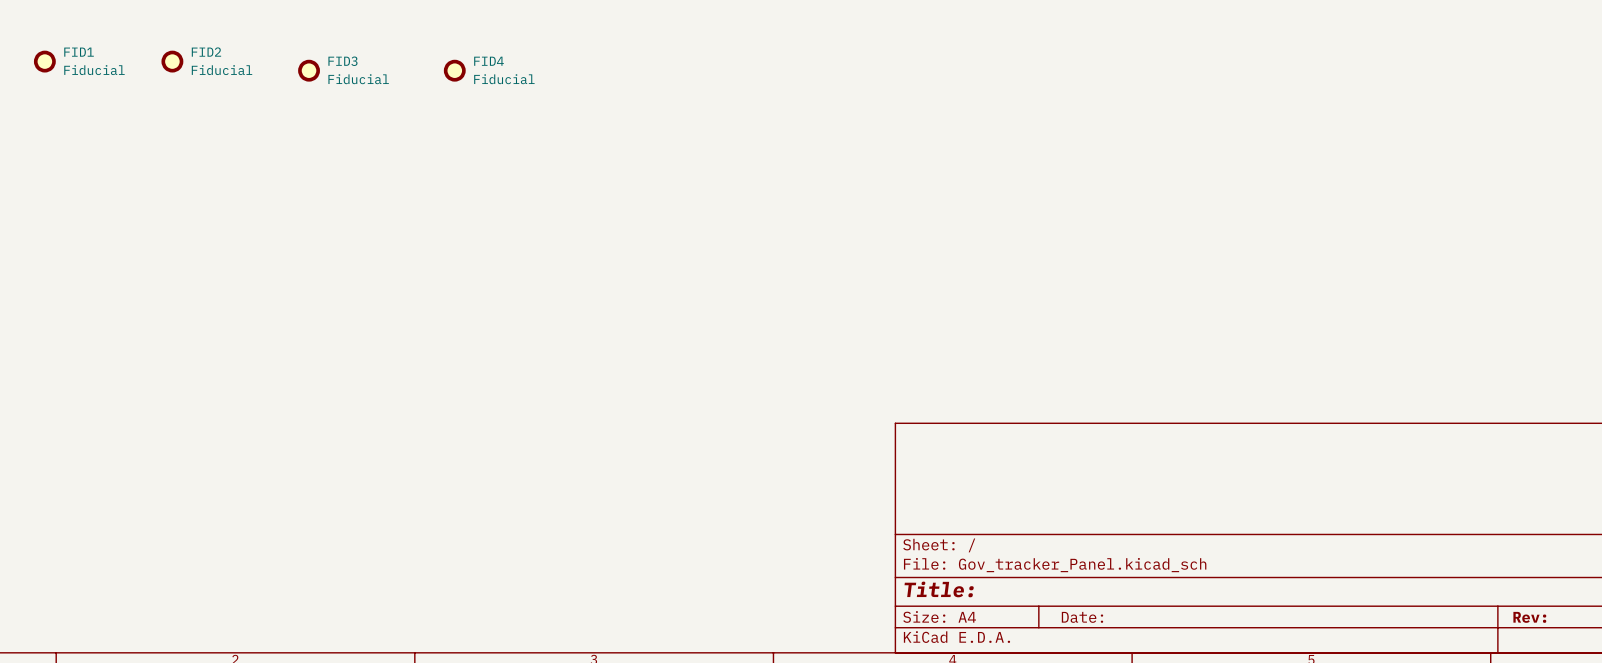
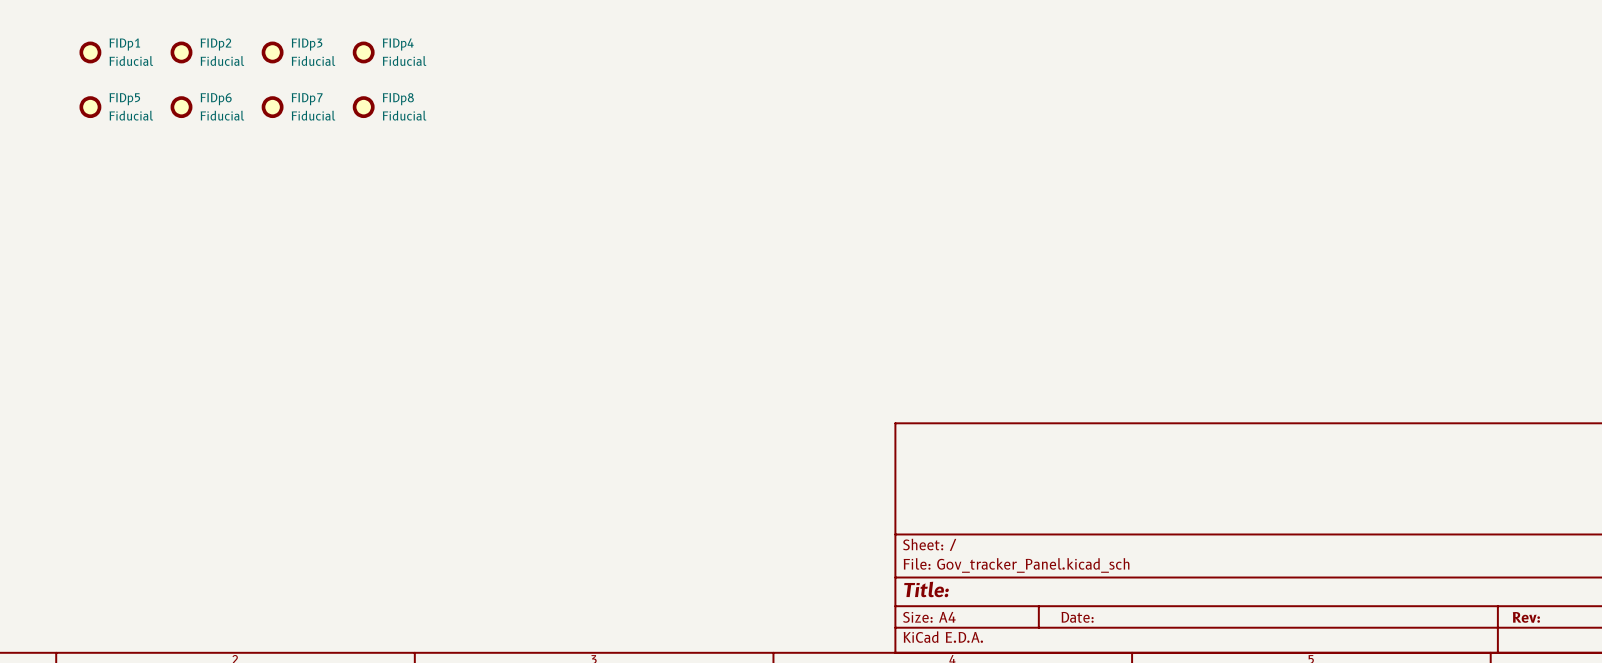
FIDp1: none -> Fiducial (90, 52)
FIDp2: none -> Fiducial (181, 52)
FIDp3: none -> Fiducial (272, 52)
FIDp4: none -> Fiducial (363, 52)
FID1: Fiducial (44, 61) -> none
FID2: Fiducial (172, 61) -> none
FID3: Fiducial (309, 70) -> none
FID4: Fiducial (454, 70) -> none
FIDp5: none -> Fiducial (90, 107)
FIDp6: none -> Fiducial (181, 107)
FIDp7: none -> Fiducial (272, 107)
FIDp8: none -> Fiducial (363, 107)

